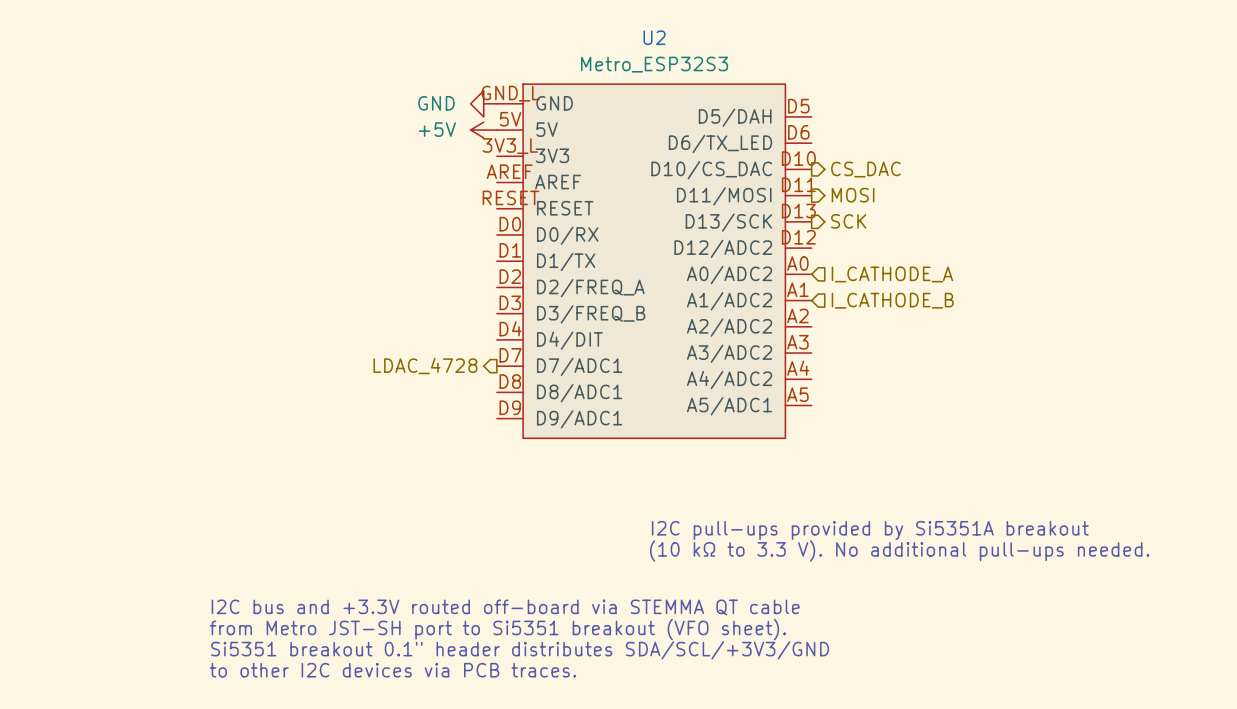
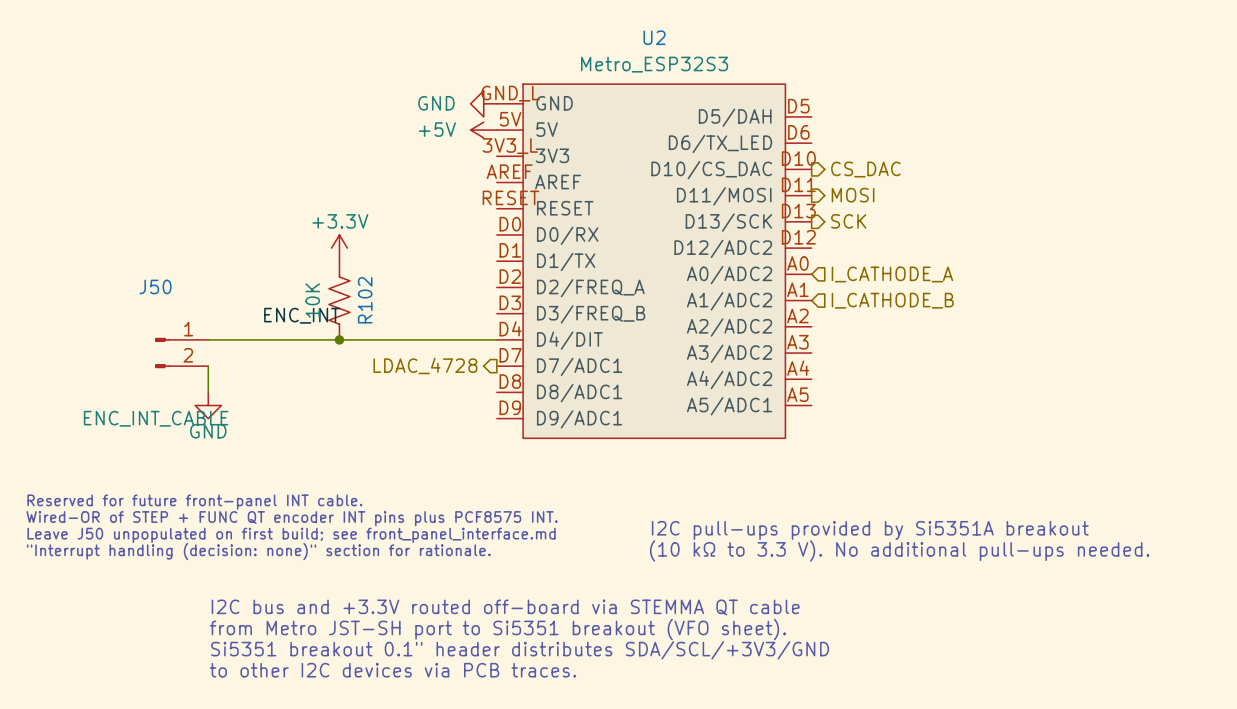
power symbol: none -> +3.3V (339, 248)
R102: none -> 10K (339, 300)
label: none -> ENC_INT (302, 315)
wire: none -> (208, 339) (496, 339)
junction: none -> (339, 339)
J50: none -> ENC_INT_CABLE (181, 353)
wire: none -> (208, 366) (208, 392)
power symbol: none -> GND (208, 405)
text: none -> Reserved for future front-panel INT cable. (194, 502)
text: none -> Wired-OR of STEP + FUNC QT encoder INT pins plus PCF8575 INT. (292, 518)
text: none -> Leave J50 unpopulated on first build; see front_panel_interface.md (291, 535)
text: none -> "Interrupt handling (decision: none)" section for rationale. (258, 551)

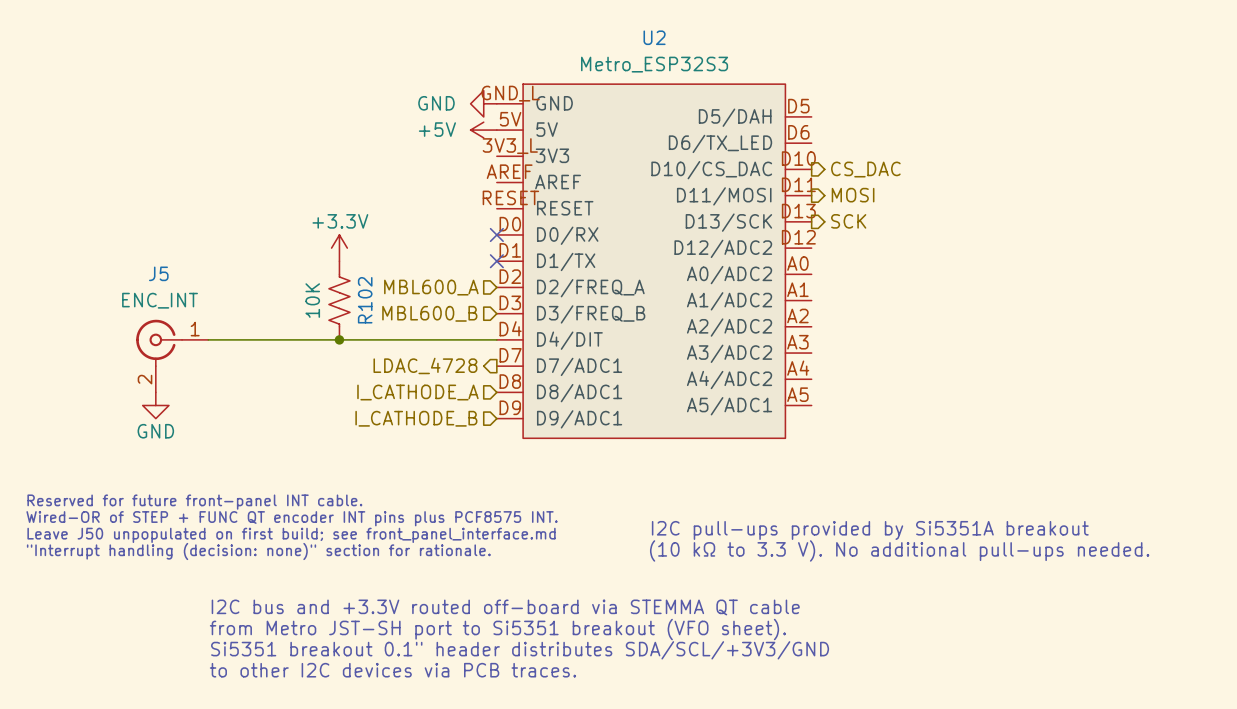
no-connect mark: none -> (496, 234)
no-connect mark: none -> (496, 261)
hierarchical label: I_CATHODE_A (892, 274) -> none
hierarchical label: none -> MBL600_A (431, 287)
hierarchical label: I_CATHODE_B (892, 300) -> none
hierarchical label: none -> MBL600_B (429, 313)
label: ENC_INT (302, 315) -> none
J50: ENC_INT_CABLE (181, 353) -> none
J5: none -> ENC_INT (172, 356)
wire: (208, 366) (208, 392) -> none
hierarchical label: none -> I_CATHODE_A (417, 392)
power symbol position: GND (208, 405) -> GND (155, 405)
hierarchical label: none -> I_CATHODE_B (416, 418)

